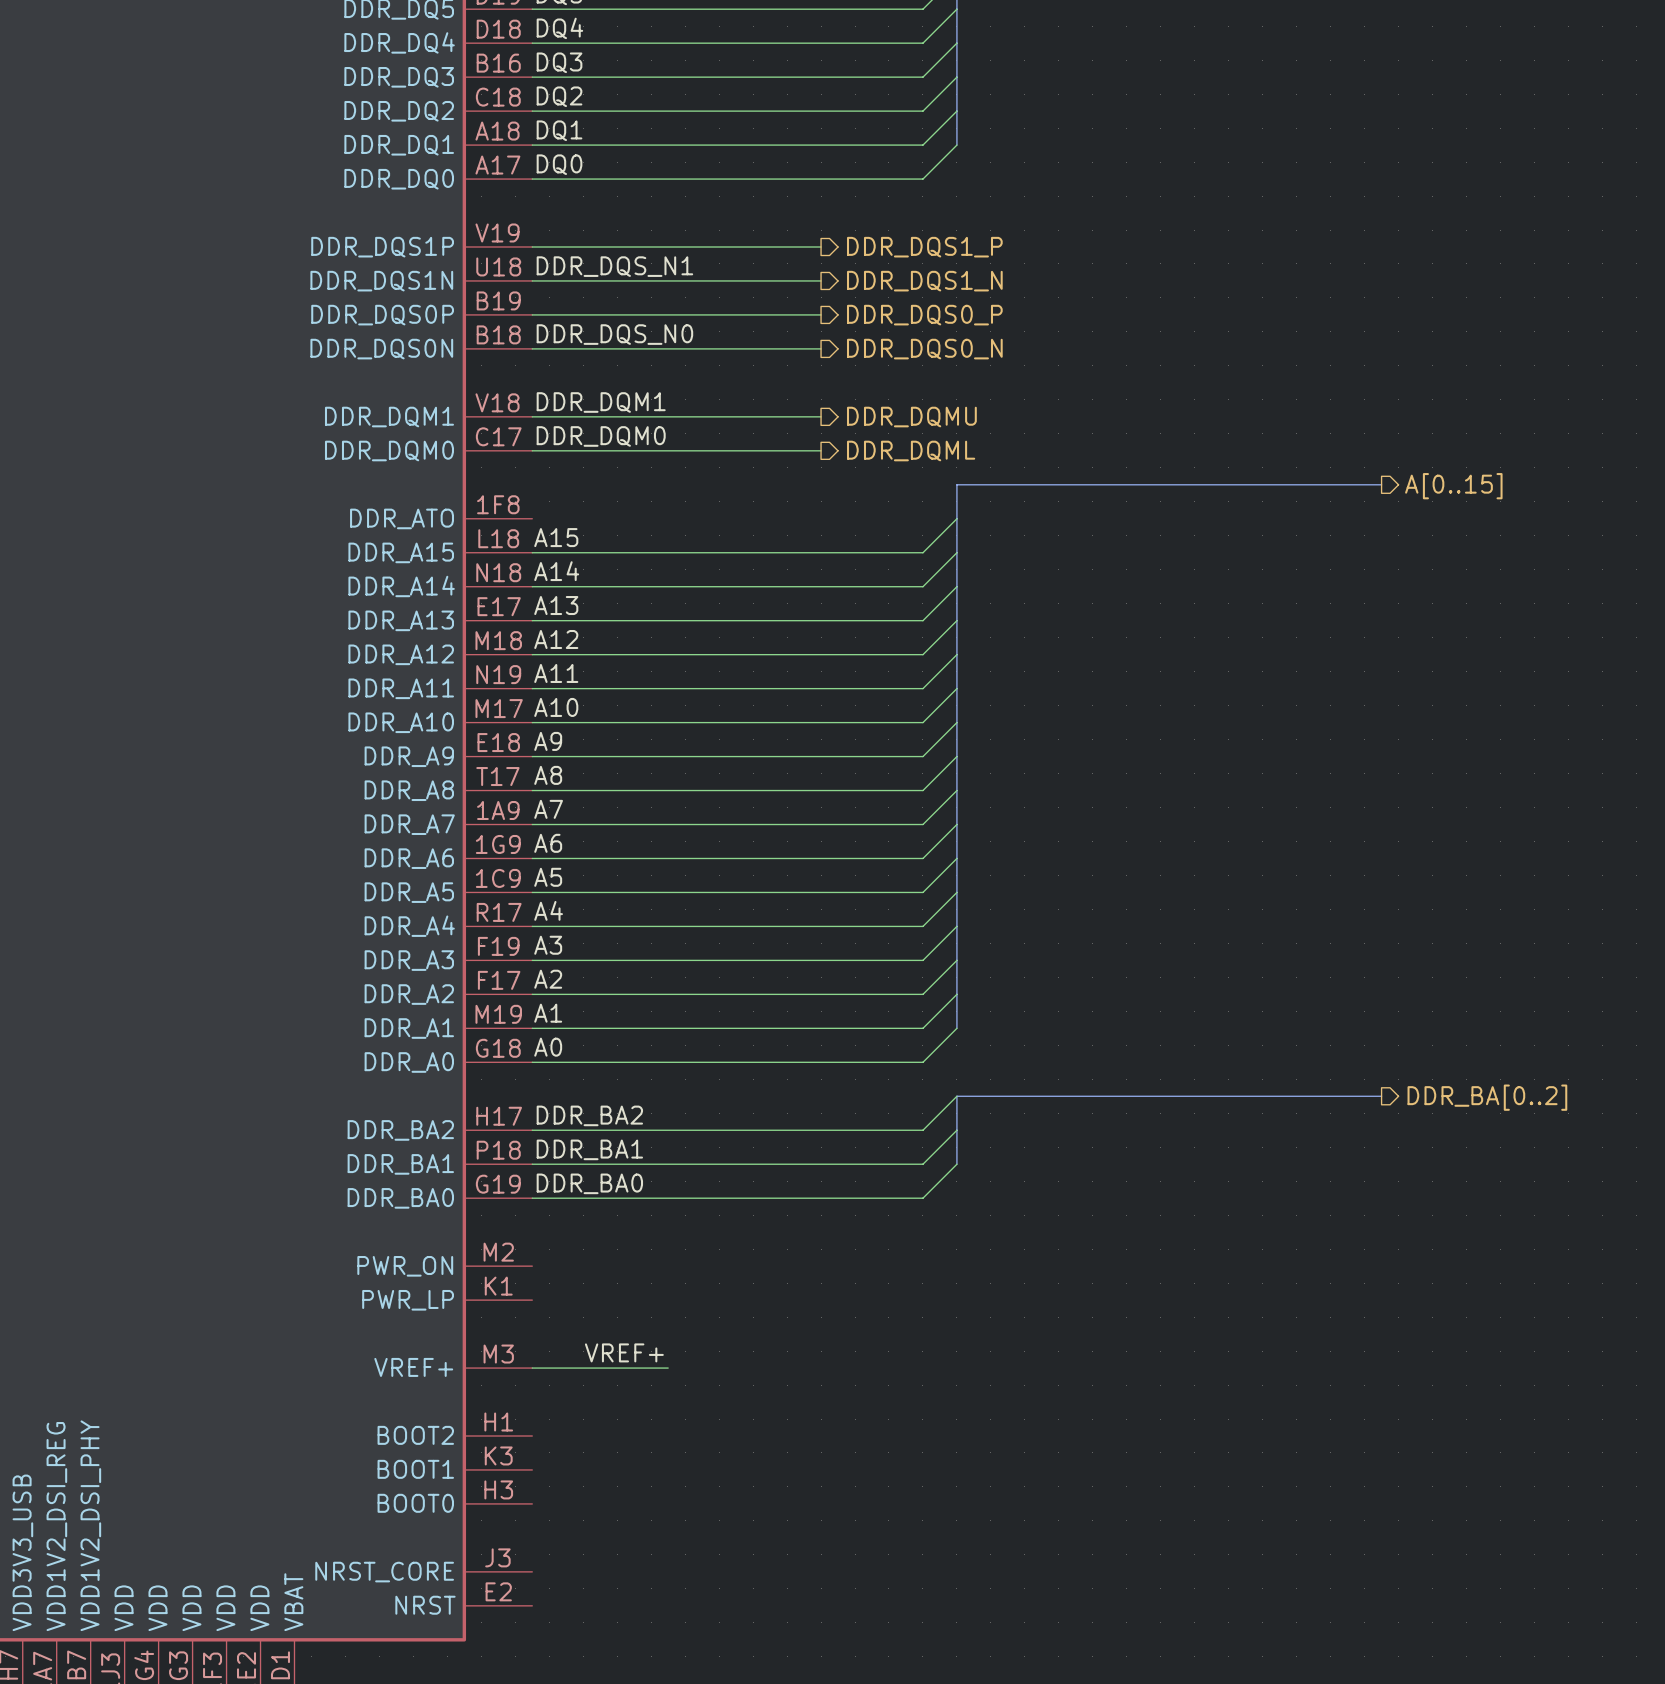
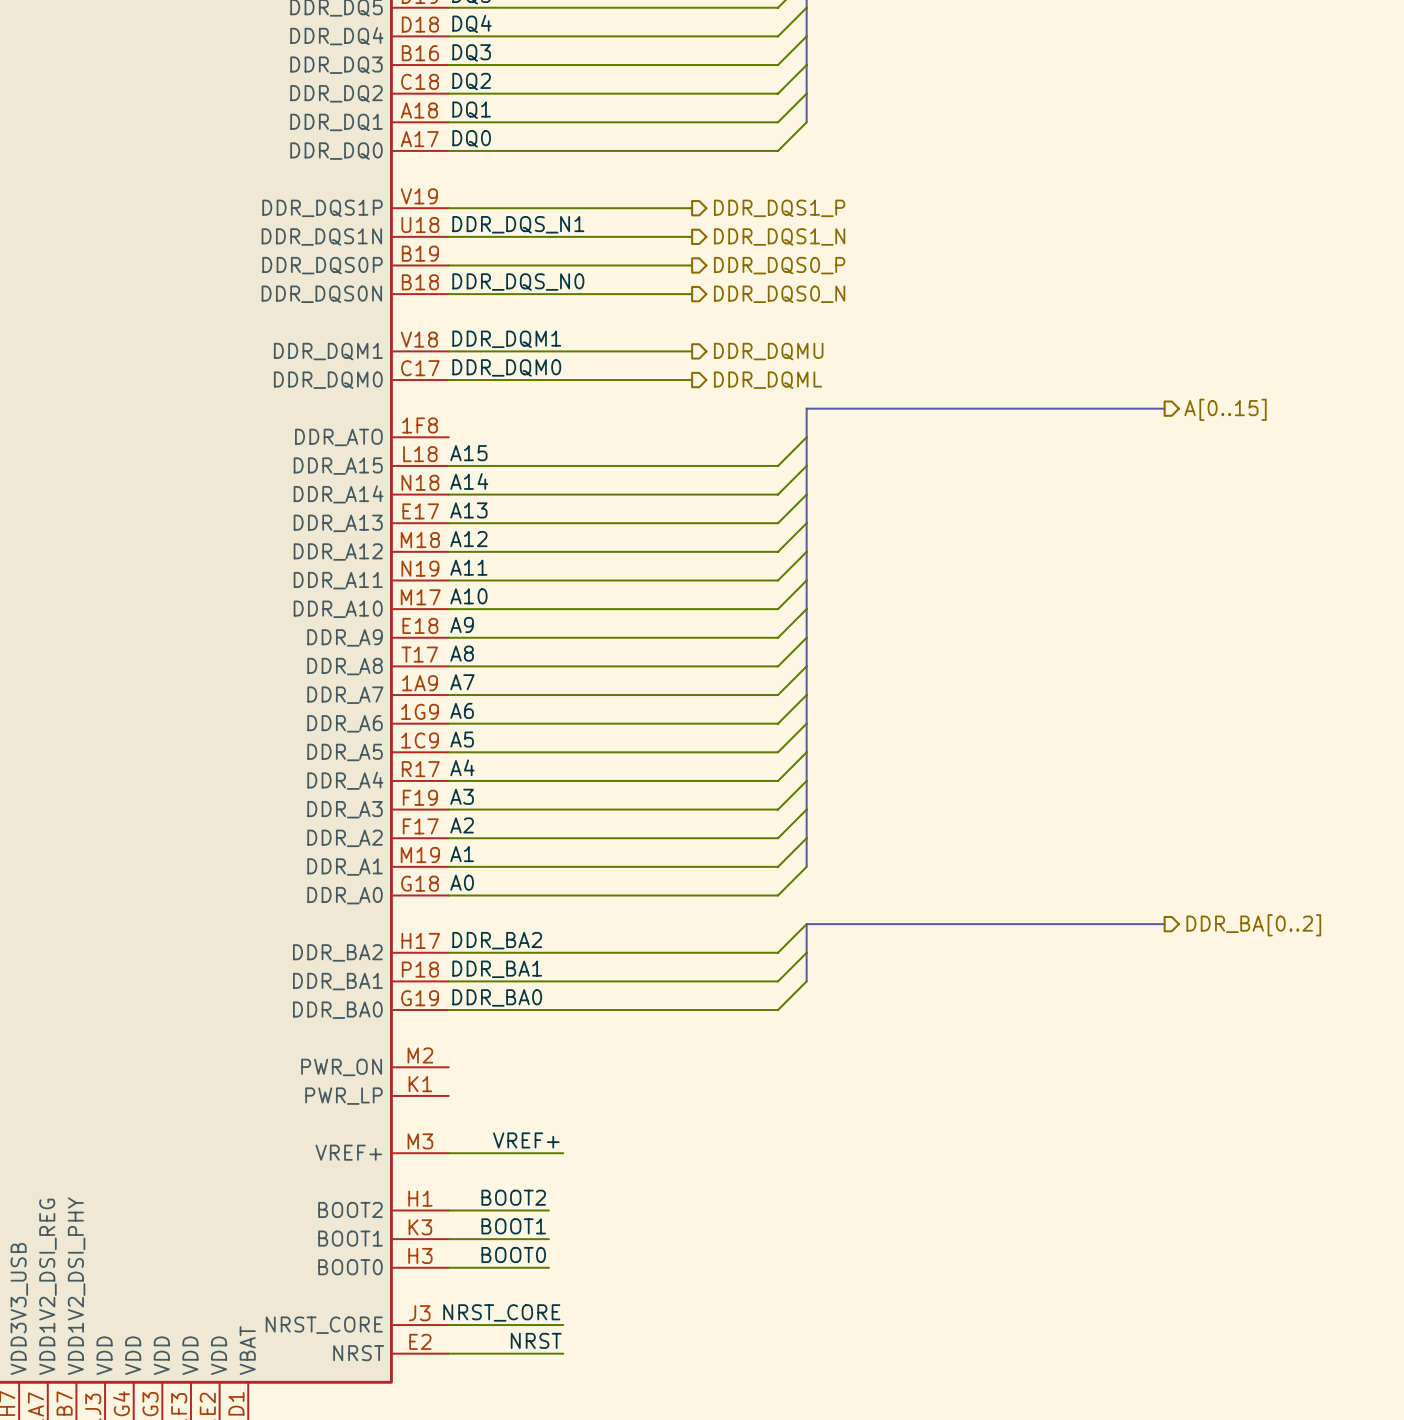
label: none -> BOOT2 (513, 1197)
wire: none -> (448, 1210) (548, 1210)
label: none -> BOOT1 (513, 1226)
wire: none -> (448, 1239) (548, 1239)
label: none -> BOOT0 (513, 1254)
wire: none -> (448, 1267) (548, 1267)
label: none -> NRST_CORE (501, 1312)
wire: none -> (448, 1325) (563, 1325)
label: none -> NRST (536, 1340)
wire: none -> (448, 1353) (563, 1353)

